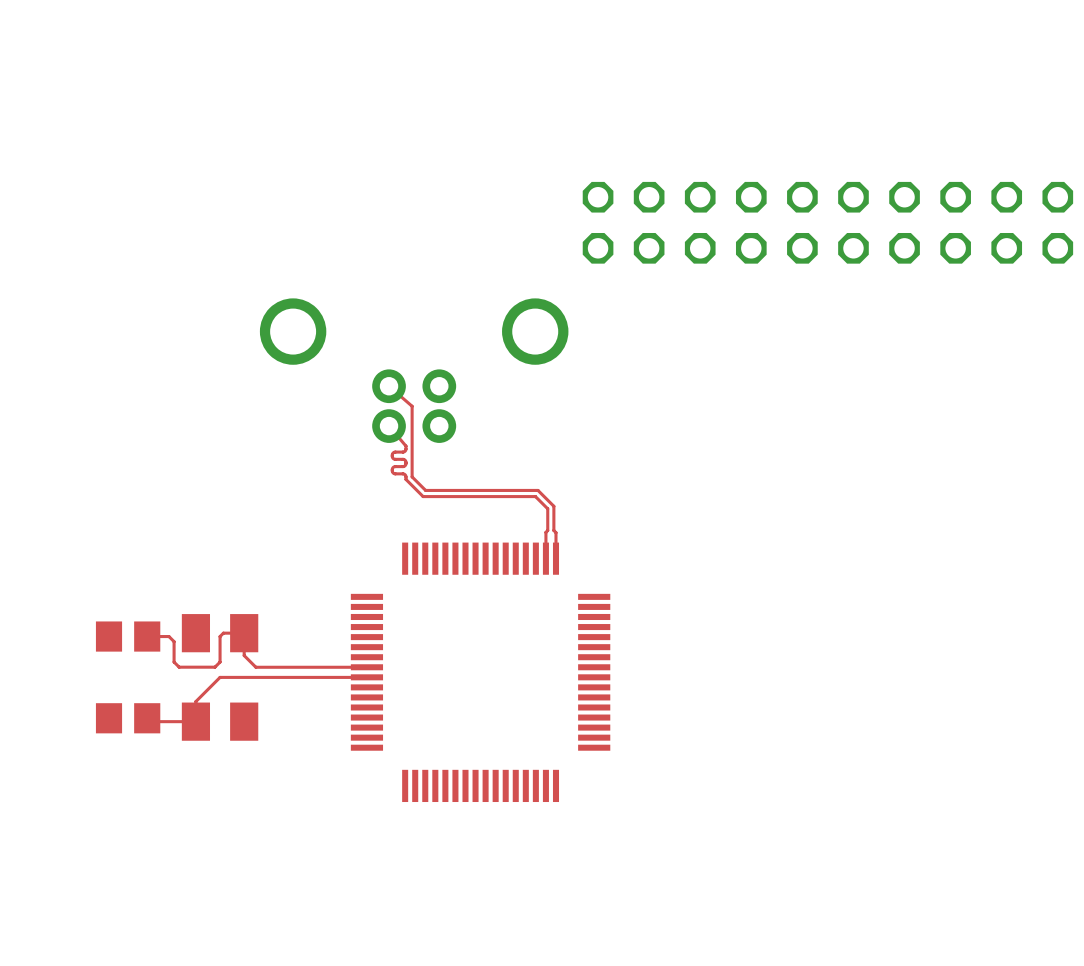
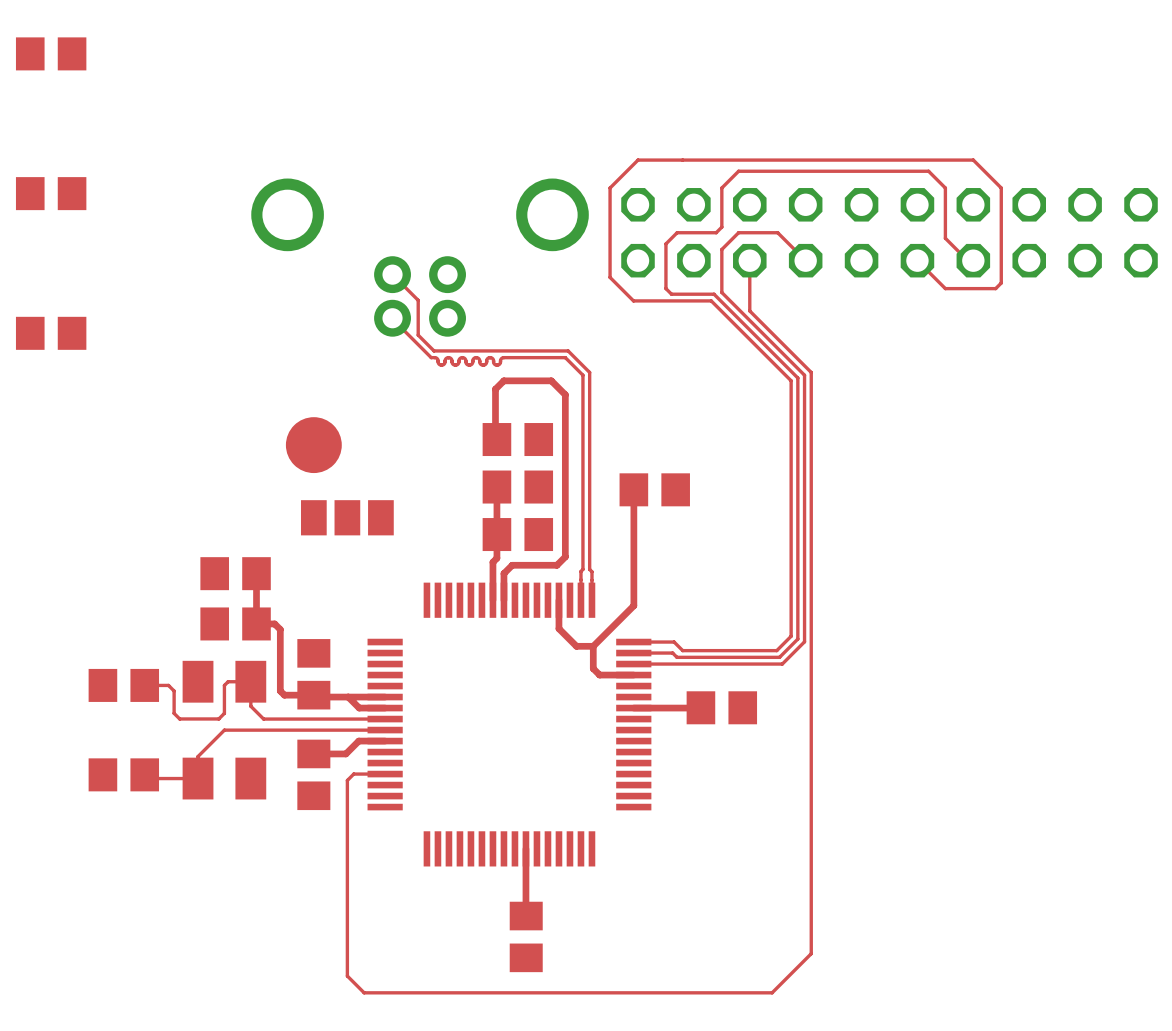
part: none -> (51, 53)
part: none -> (51, 193)
top track: none -> (749, 260) (749, 310) (811, 372) (811, 953) (772, 992) (364, 992) (347, 976) (347, 780) (353, 774) (385, 774)
top track: none -> (805, 260) (777, 232) (738, 232) (721, 249) (721, 292) (804, 375) (804, 641) (782, 664) (633, 664)
top track: none -> (917, 260) (945, 288) (995, 288) (1001, 283) (1001, 188) (973, 160) (638, 160) (610, 188) (610, 277) (633, 300) (711, 300) (791, 380) (791, 636) (776, 650) (682, 650) (674, 642) (633, 642)
top track: none -> (973, 260) (967, 260) (945, 238) (945, 188) (928, 171) (738, 171) (721, 188) (721, 227) (716, 232) (677, 232) (665, 243) (665, 288) (671, 294) (714, 294) (797, 378) (797, 639) (779, 657) (676, 657) (672, 653) (633, 653)
top track: none -> (392, 318) (431, 357) (437, 358) (441, 365)
part: none -> (51, 333)
top track: none -> (448, 357) (455, 365)
top track: none -> (448, 357) (441, 365)
top track: none -> (462, 357) (469, 365)
top track: none -> (462, 357) (455, 365)
top track: none -> (476, 357) (483, 365)
top track: none -> (476, 357) (469, 365)
top track: none -> (490, 357) (483, 365)
top track: none -> (490, 357) (496, 365)
part position: (414, 370) -> (420, 257)
top track: (389, 386) (412, 406) (412, 476) (425, 490) (538, 490) (553, 506) -> (392, 274) (418, 300) (418, 335) (434, 350) (568, 350) (589, 372) (589, 542)
top track: none -> (496, 439) (495, 389) (503, 380) (551, 380) (565, 394) (565, 556) (556, 565) (512, 565) (503, 573) (503, 600)
part: none -> (517, 439)
part: none -> (313, 445)
top track: (389, 426) (405, 446) (404, 451) (394, 452) (392, 455) (394, 459) (404, 459) (405, 465) (393, 467) (392, 471) (404, 474) (405, 479) (423, 496) (535, 496) (547, 508) -> (497, 365) (503, 357) (565, 357) (582, 375) (582, 545)
top track: none -> (496, 487) (496, 558) (492, 562) (492, 600)
part: none -> (517, 487)
top track: none -> (633, 489) (633, 605) (593, 646)
part: none -> (654, 489)
part: none -> (347, 517)
part: none -> (517, 534)
part: none -> (235, 573)
top track: none -> (256, 573) (256, 623) (274, 623) (280, 629) (280, 691) (284, 695) (385, 697)
top track: none -> (558, 600) (558, 628) (576, 646) (593, 646)
part: none -> (235, 623)
top track: none -> (593, 646) (593, 668) (599, 675) (633, 675)
part: none -> (313, 674)
top track: none -> (348, 697) (359, 708) (385, 708)
part: none -> (721, 707)
top track: none -> (700, 708) (633, 708)
top track: none -> (385, 741) (358, 741) (345, 753) (313, 753)
part: none -> (313, 774)
top track: none -> (525, 848) (525, 915)
part: none -> (526, 936)

